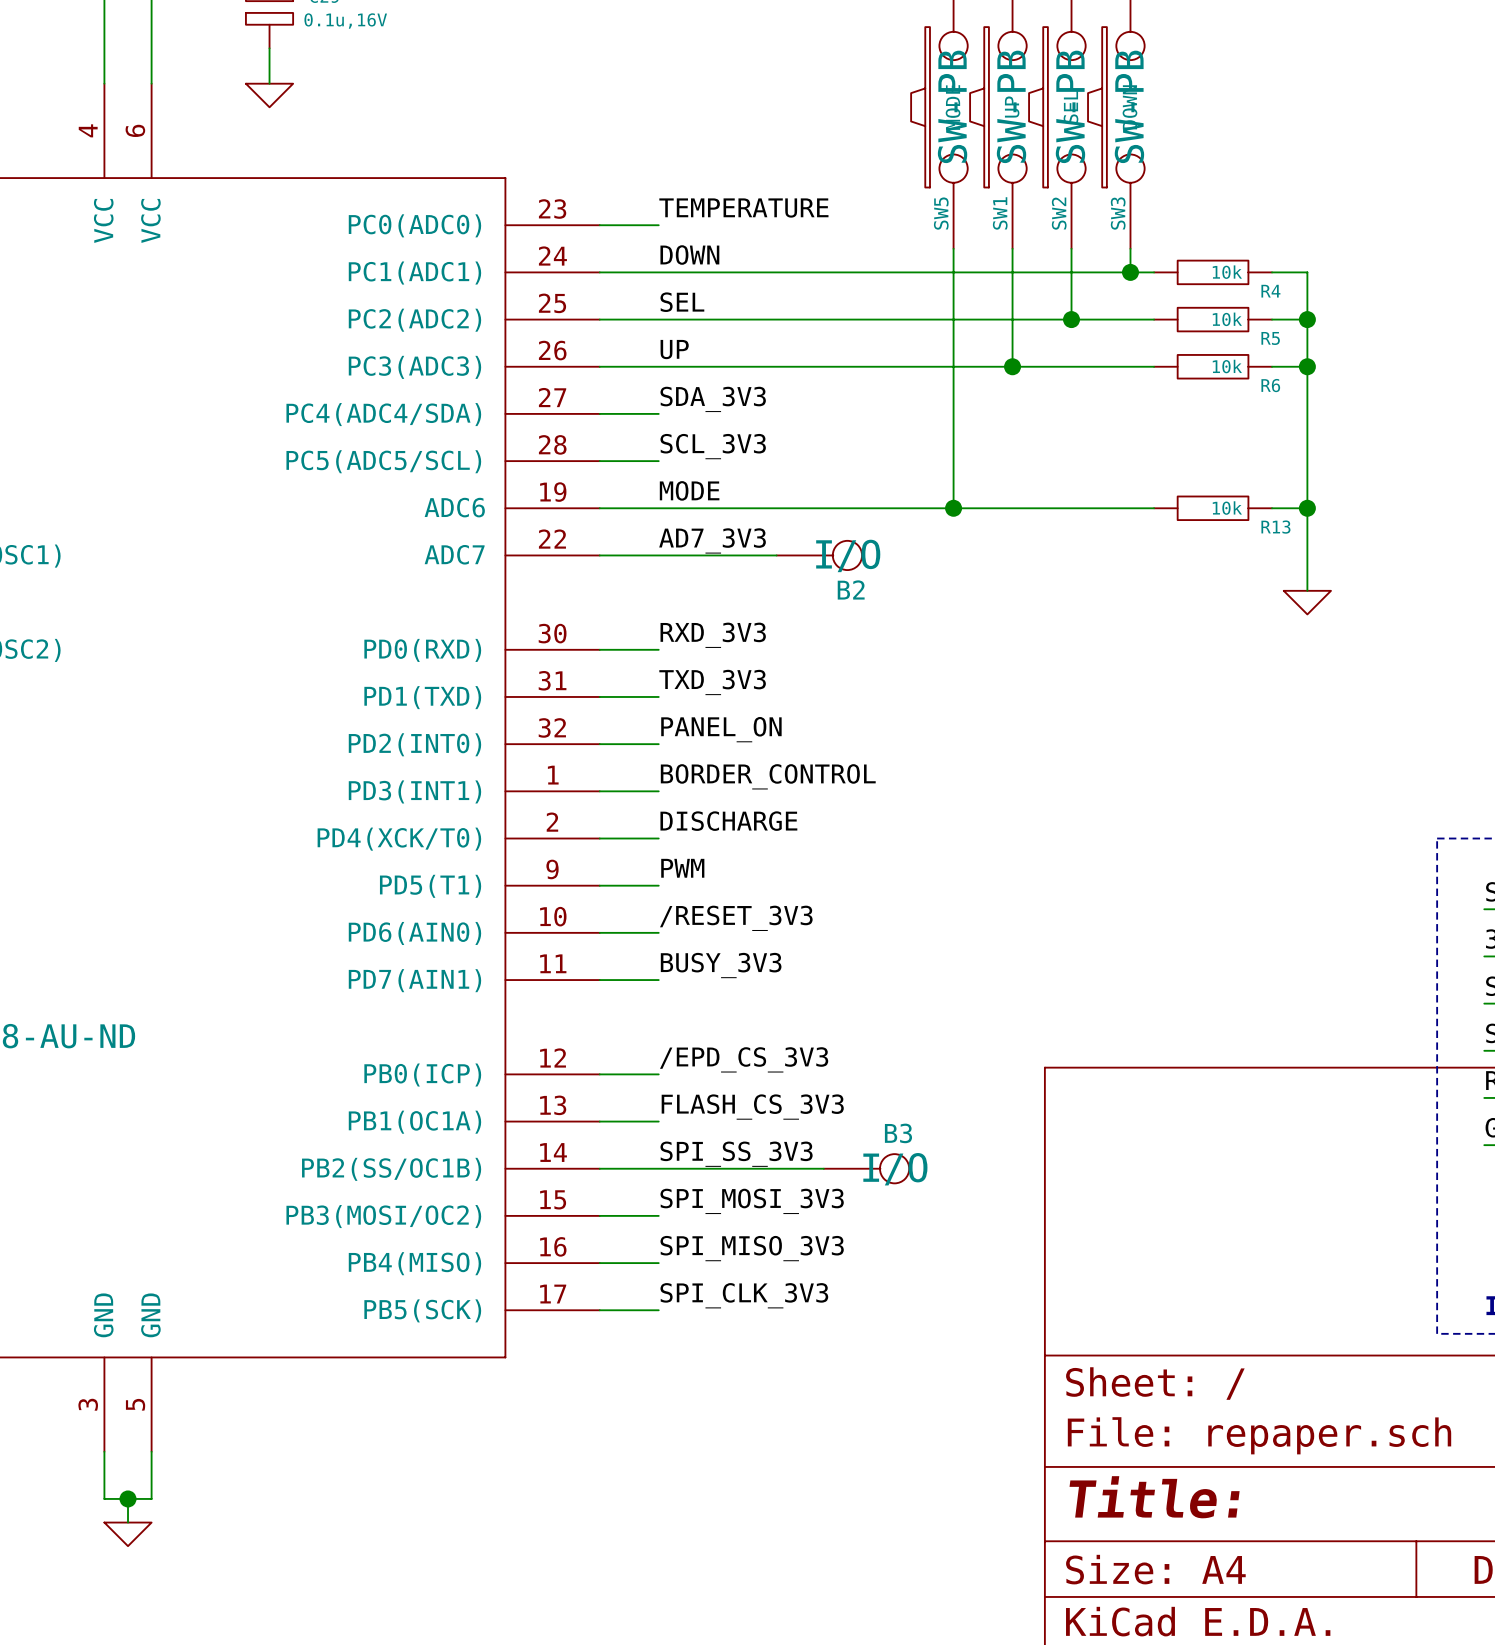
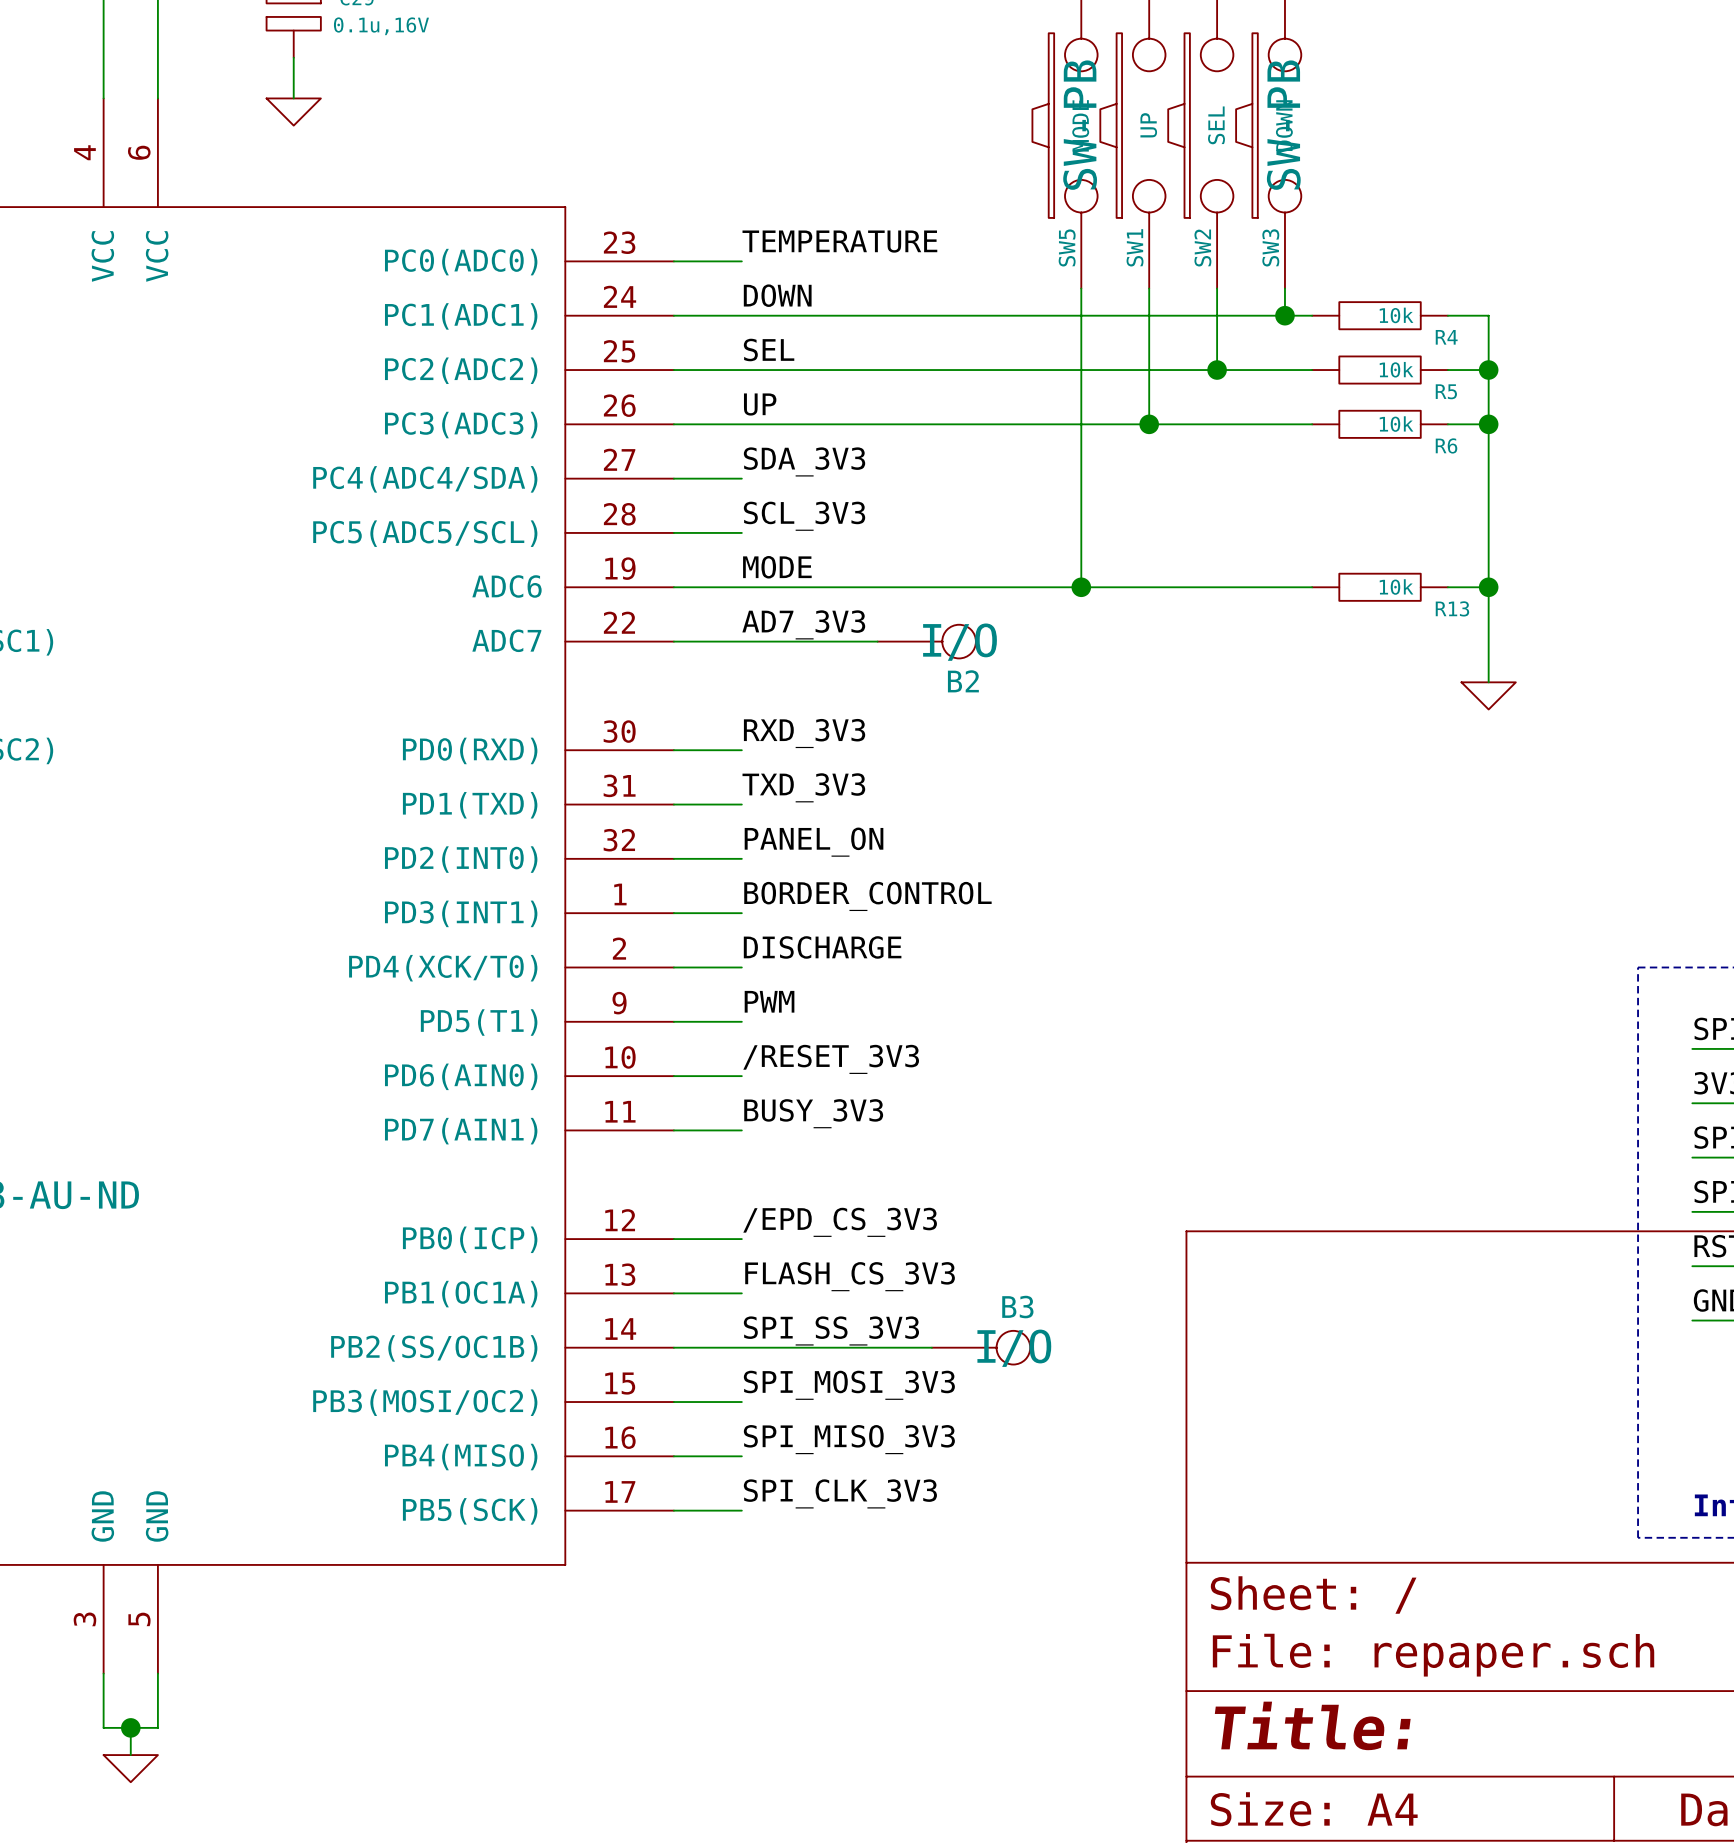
SW1 text: SW-PB (1011, 106) -> none
SW2 text: SW-PB (1070, 106) -> none

